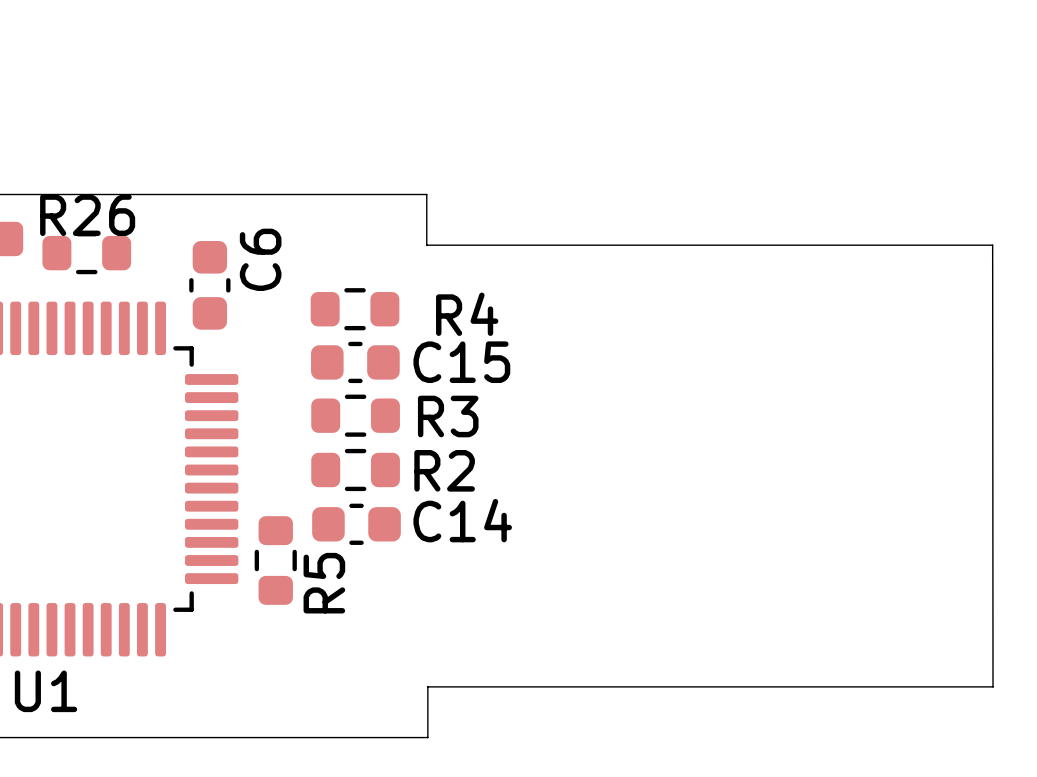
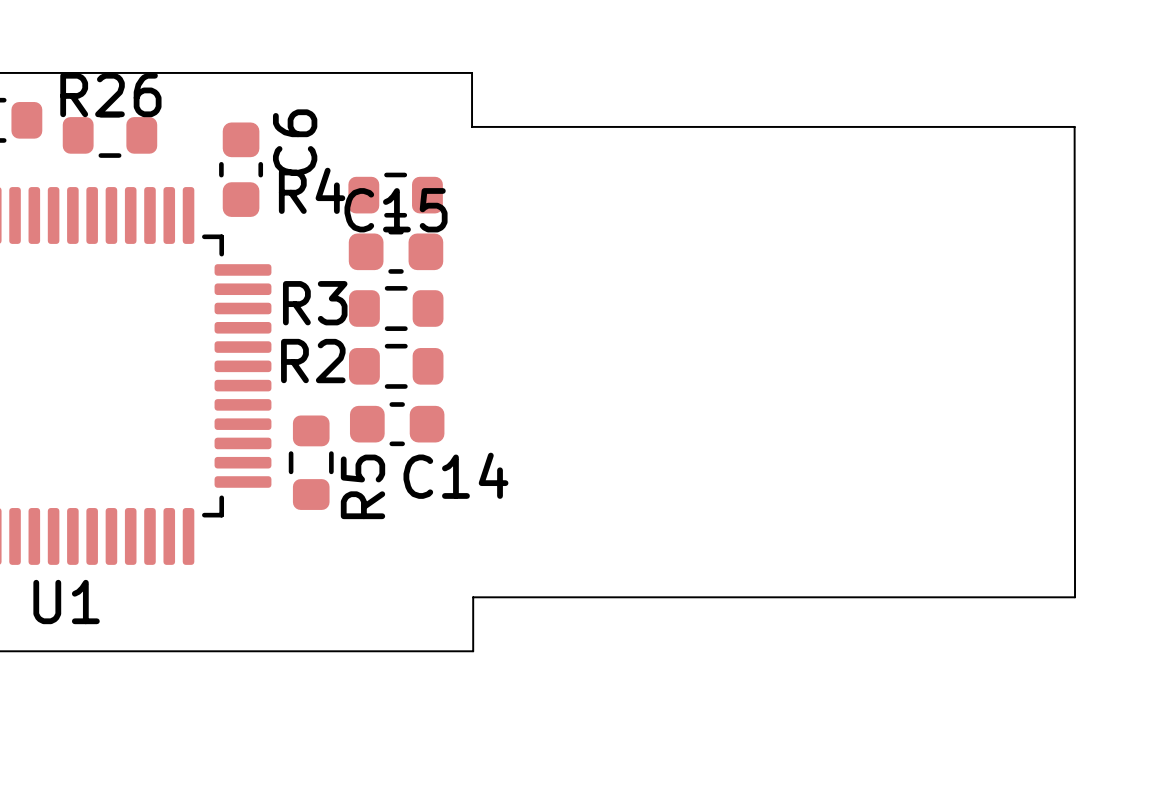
R4 name position: R4 (467, 314) -> R4 (312, 190)
C15 name position: C15 (461, 362) -> C15 (396, 210)
R3 name position: R3 (448, 416) -> R3 (315, 303)
R2 name position: R2 (444, 470) -> R2 (313, 361)
C14 name position: C14 (462, 520) -> C14 (455, 475)

